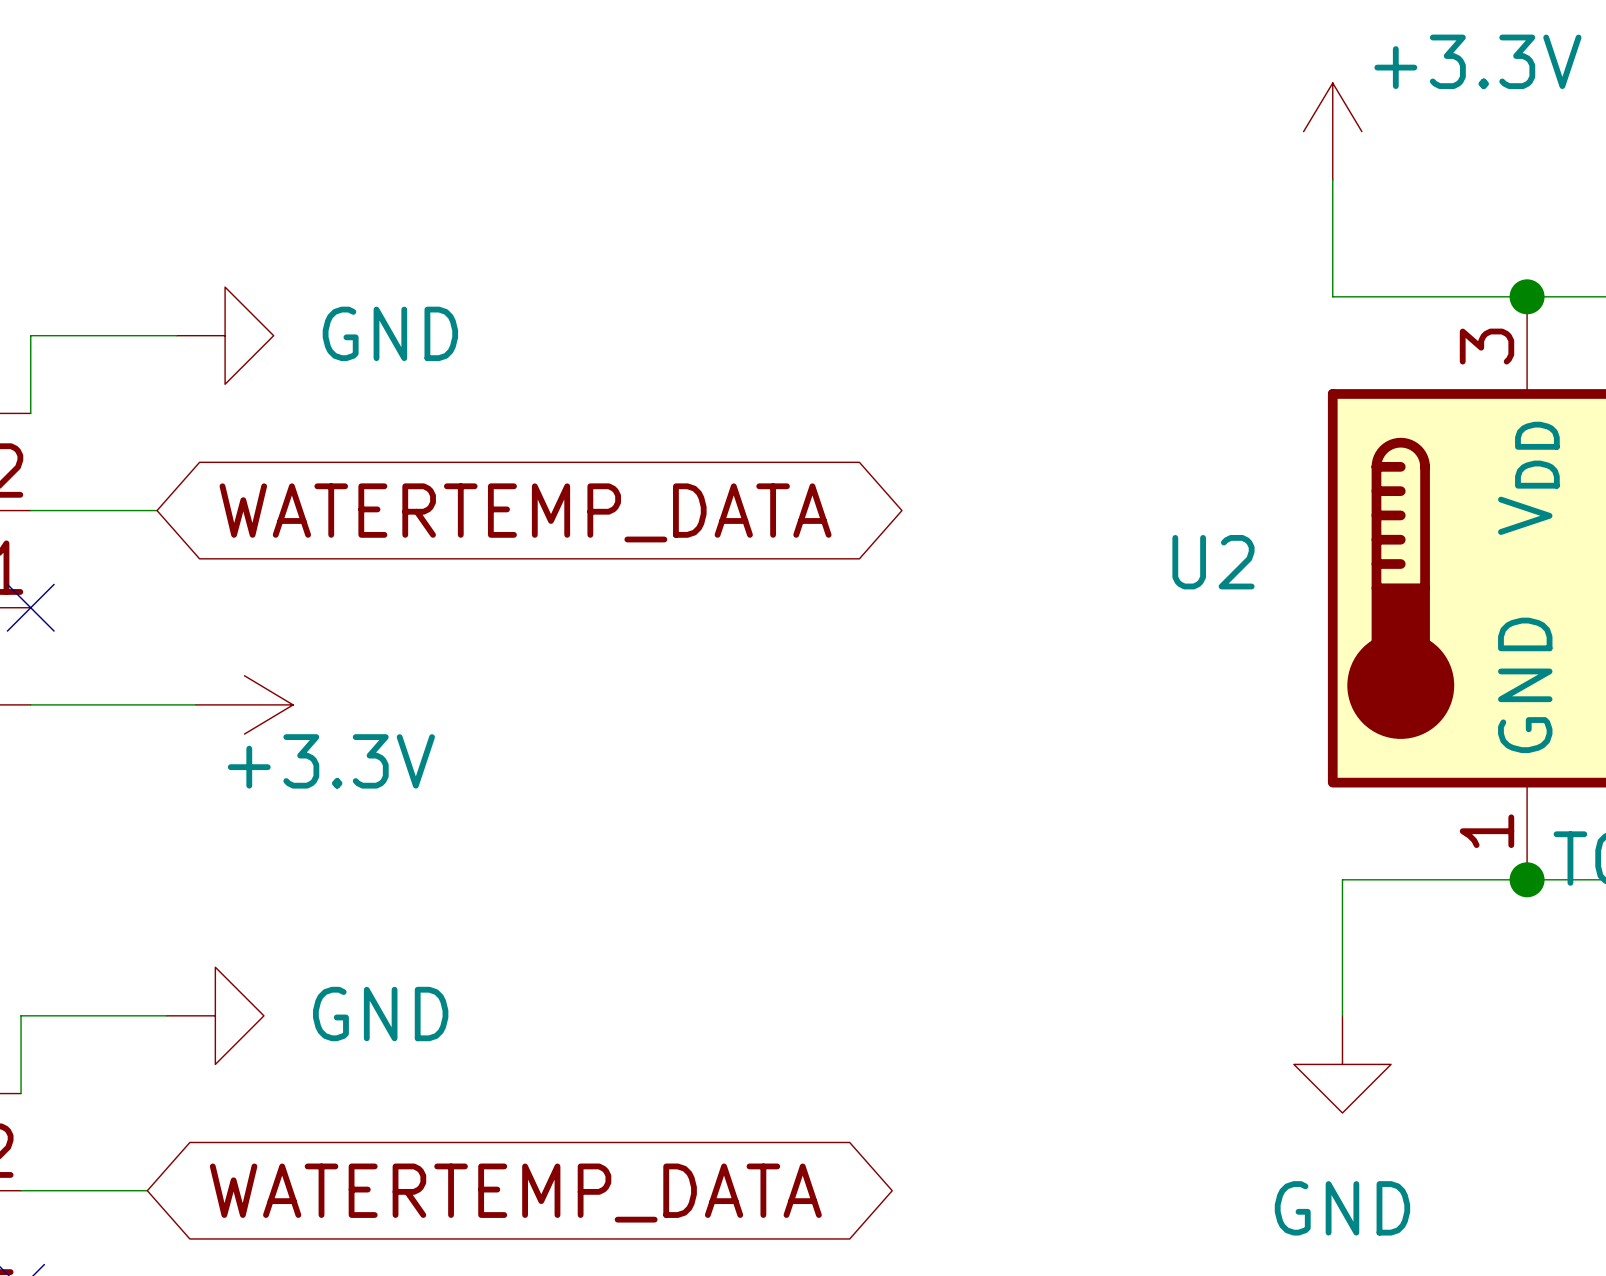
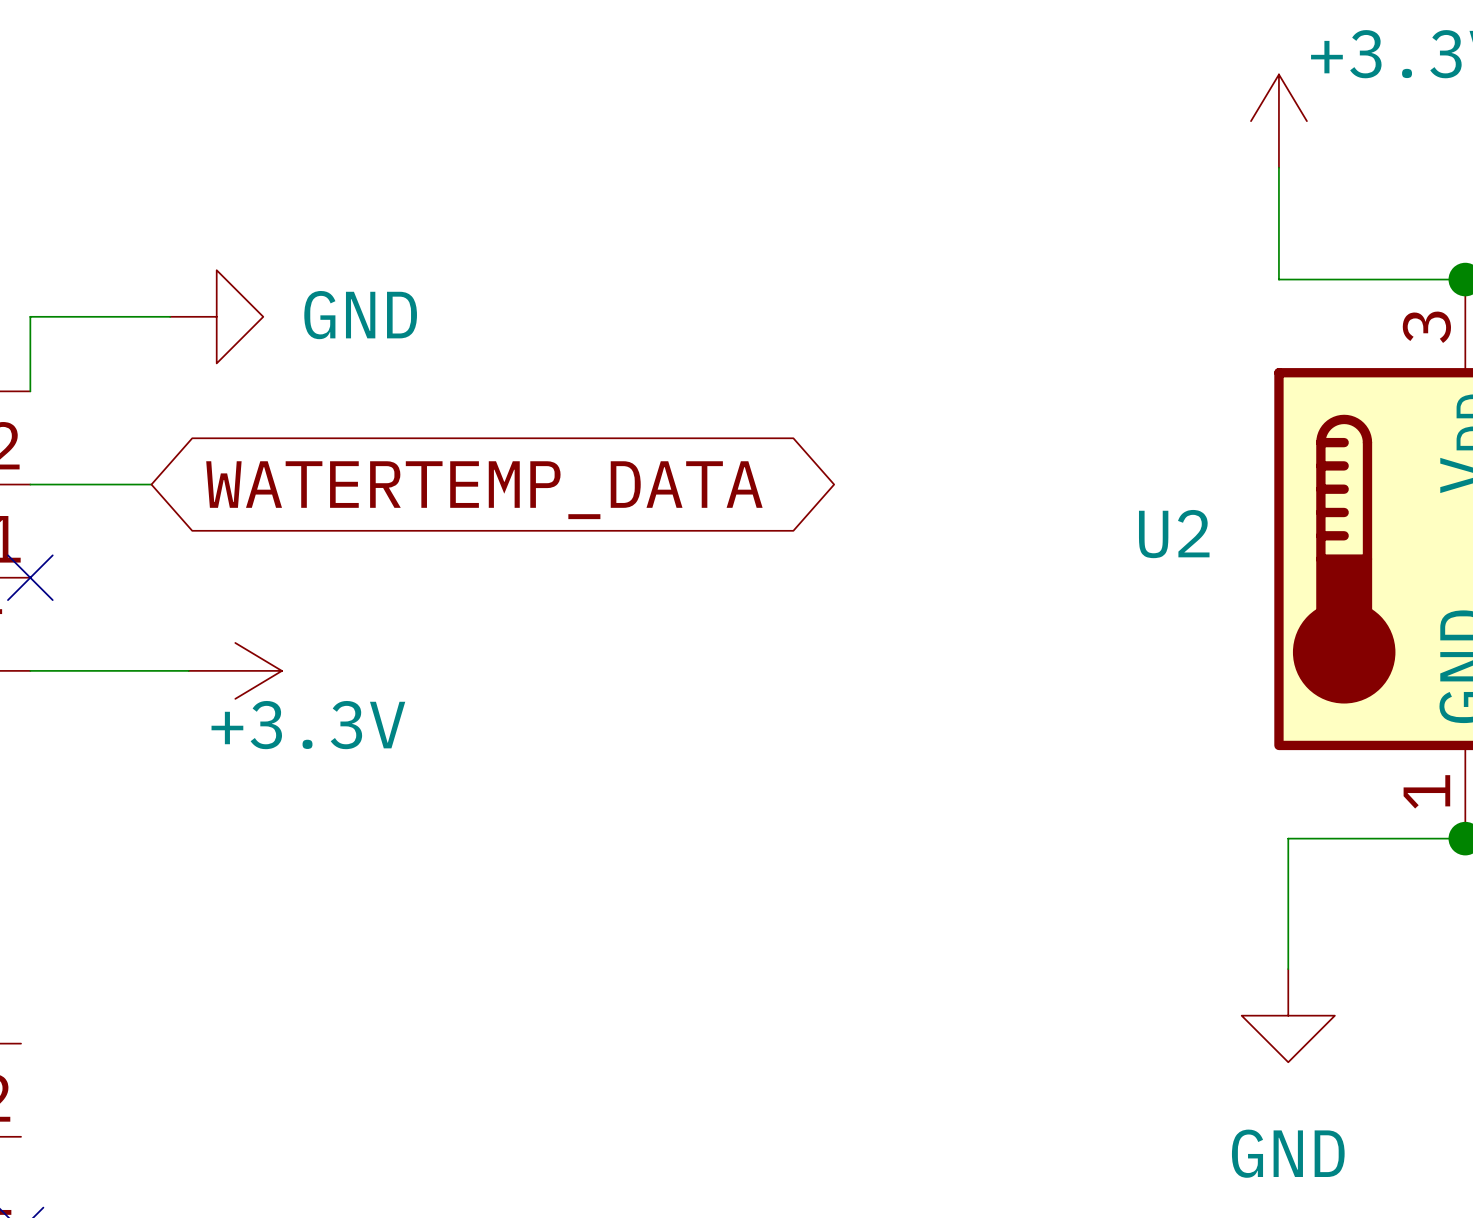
wire: (166, 1015) (21, 1015) (21, 1093) -> none
power symbol: GND (215, 1015) -> none
wire: (21, 1190) (147, 1190) -> none
global label: WATERTEMP_DATA (515, 1193) -> none

